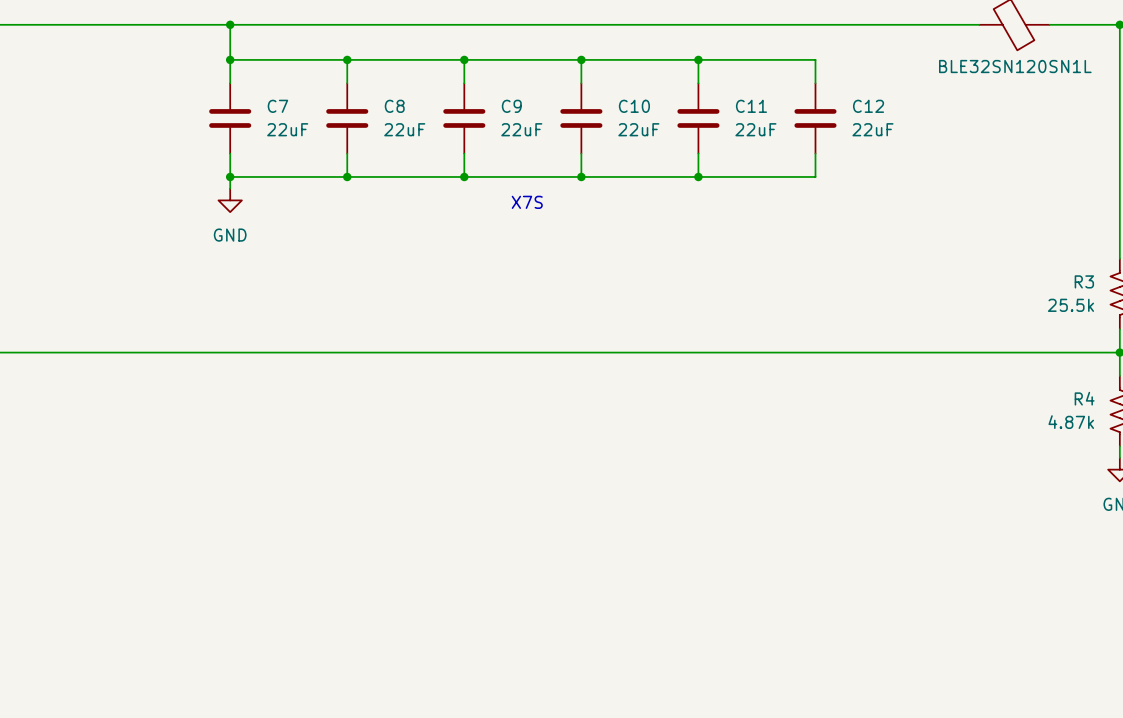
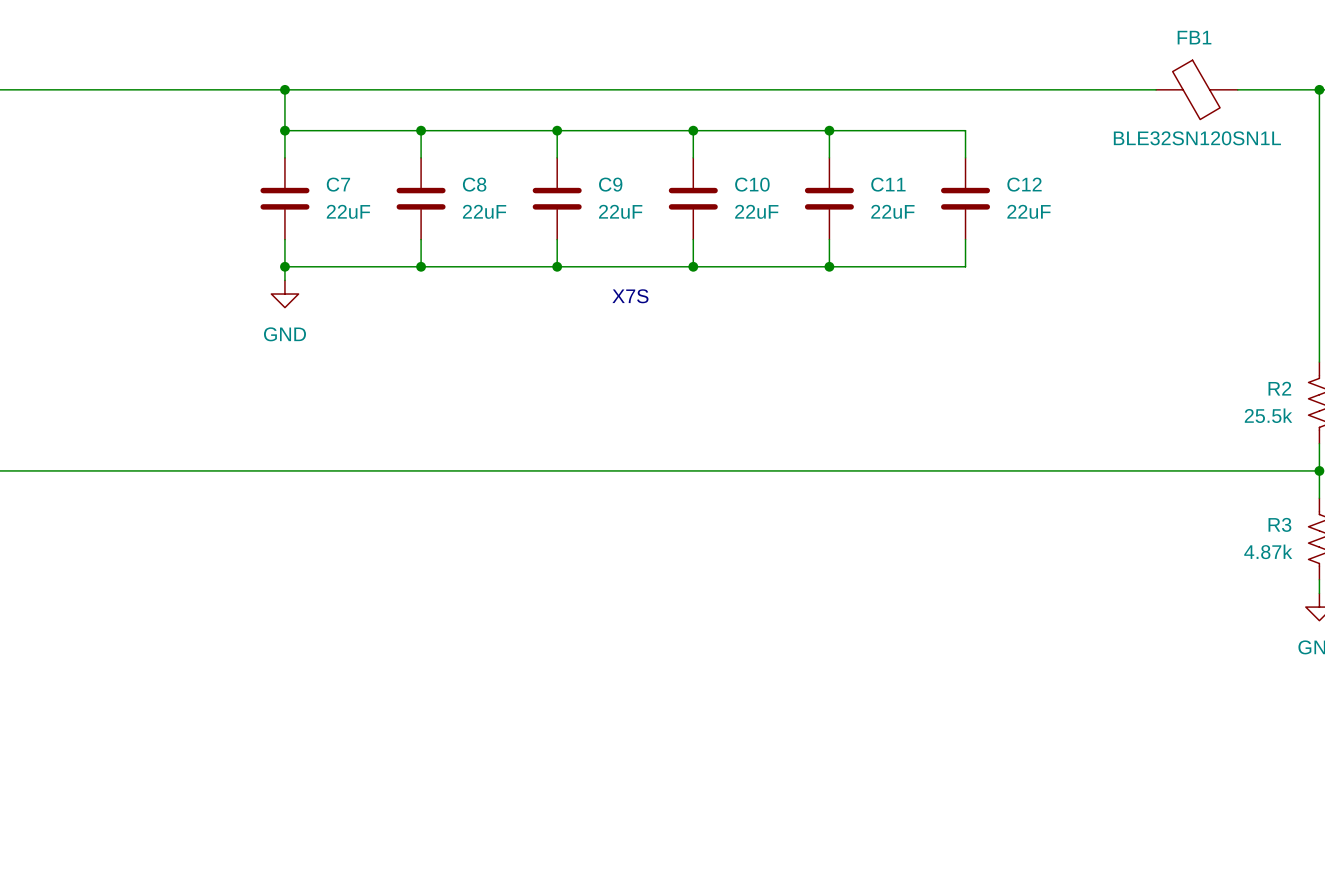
R3 name: R3 (1084, 281) -> R2 (1279, 388)
R4 name: R4 (1084, 398) -> R3 (1279, 524)

